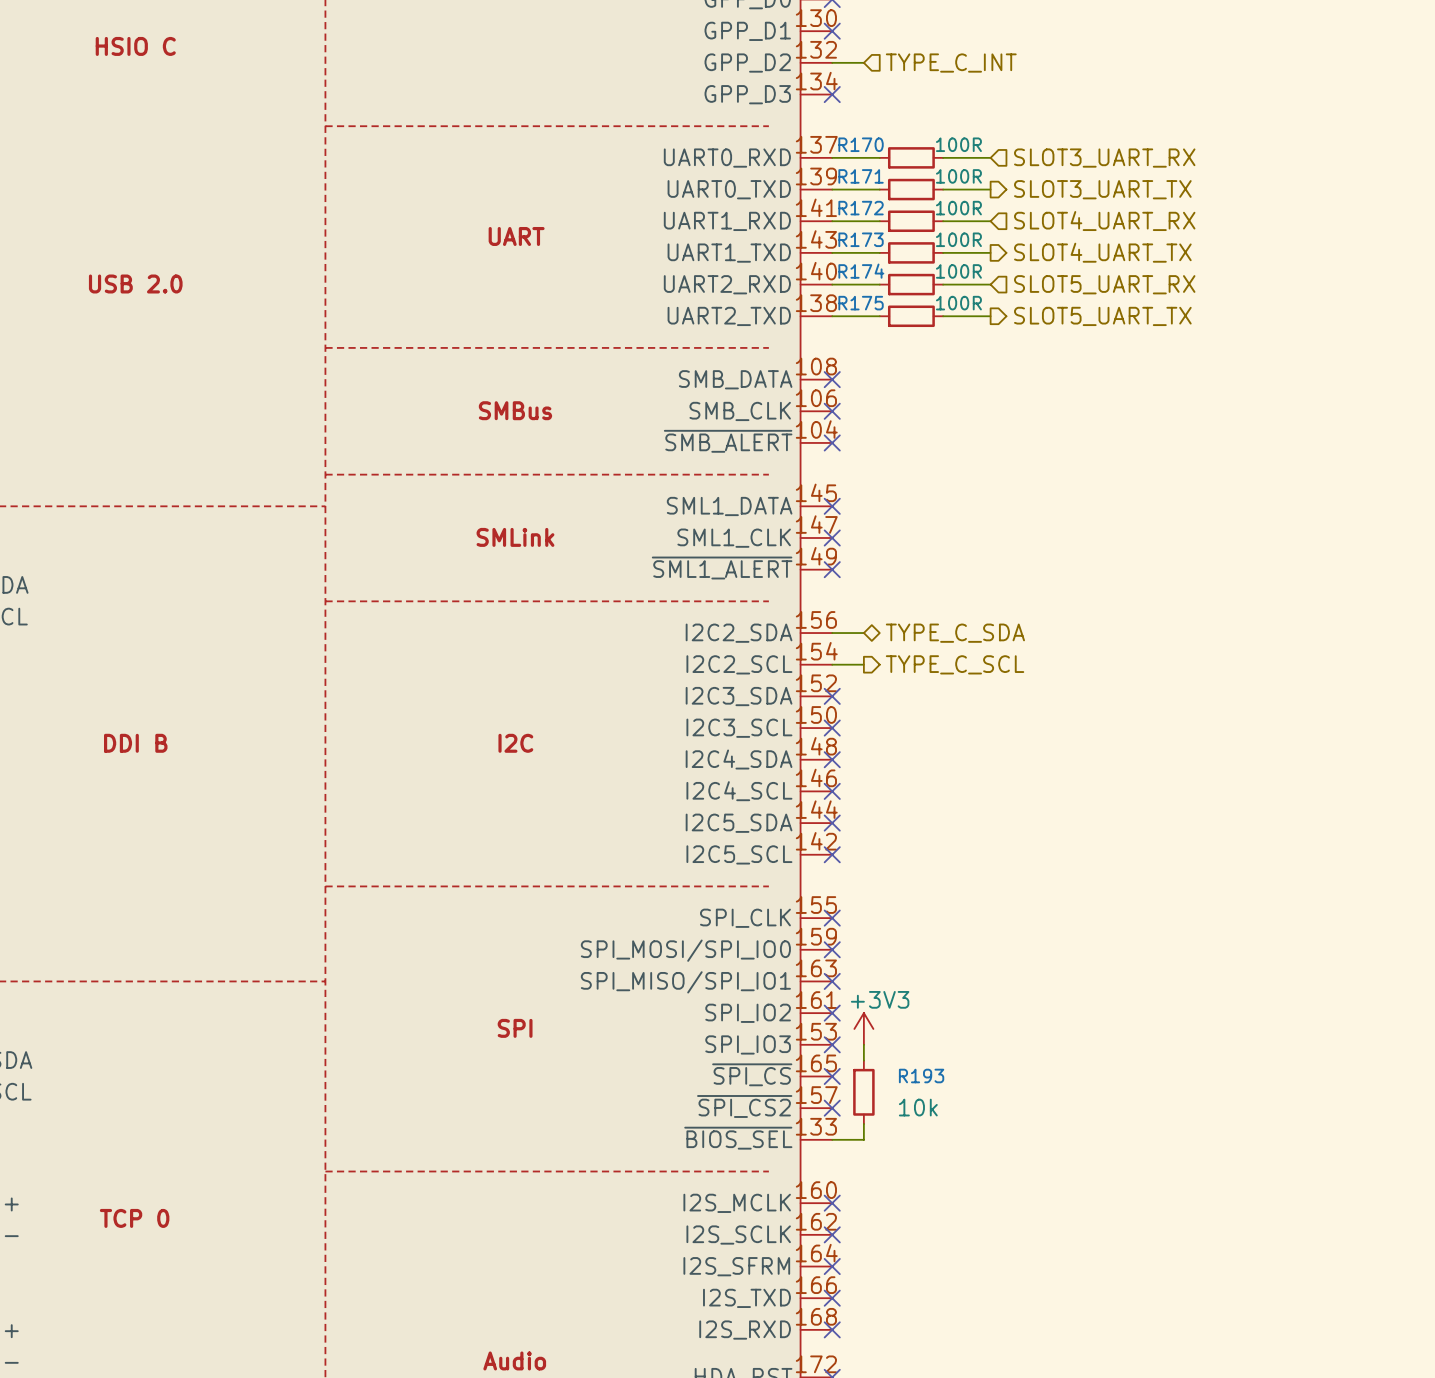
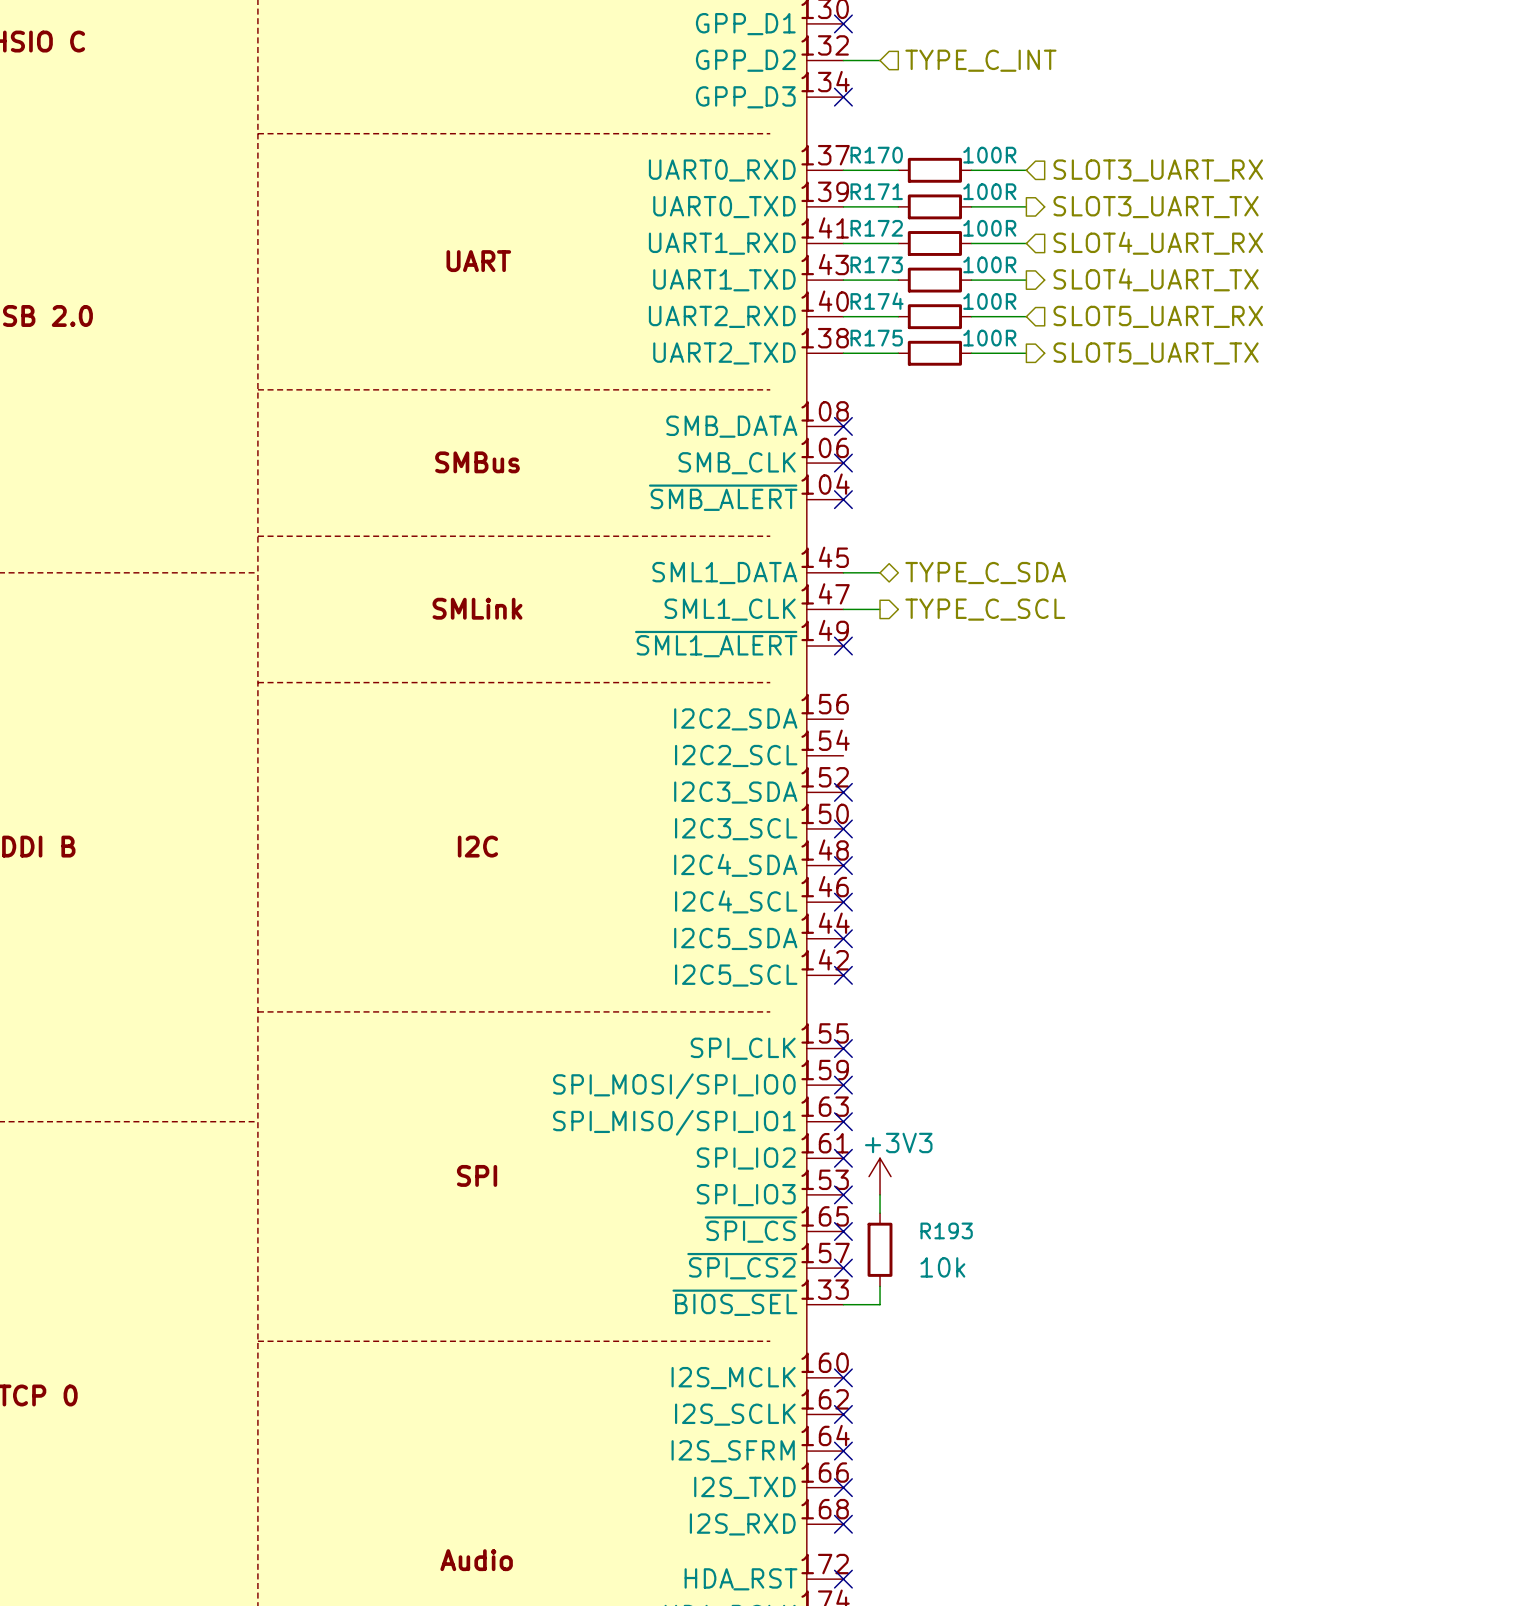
no-connect mark: (832, 506) -> none
no-connect mark: (832, 537) -> none
wire: (832, 633) (863, 633) -> (843, 609) (880, 609)
hierarchical label position: TYPE_C_SDA (955, 633) -> TYPE_C_SDA (985, 573)
wire: (832, 664) (863, 664) -> (843, 572) (880, 572)
hierarchical label position: TYPE_C_SCL (955, 664) -> TYPE_C_SCL (985, 609)

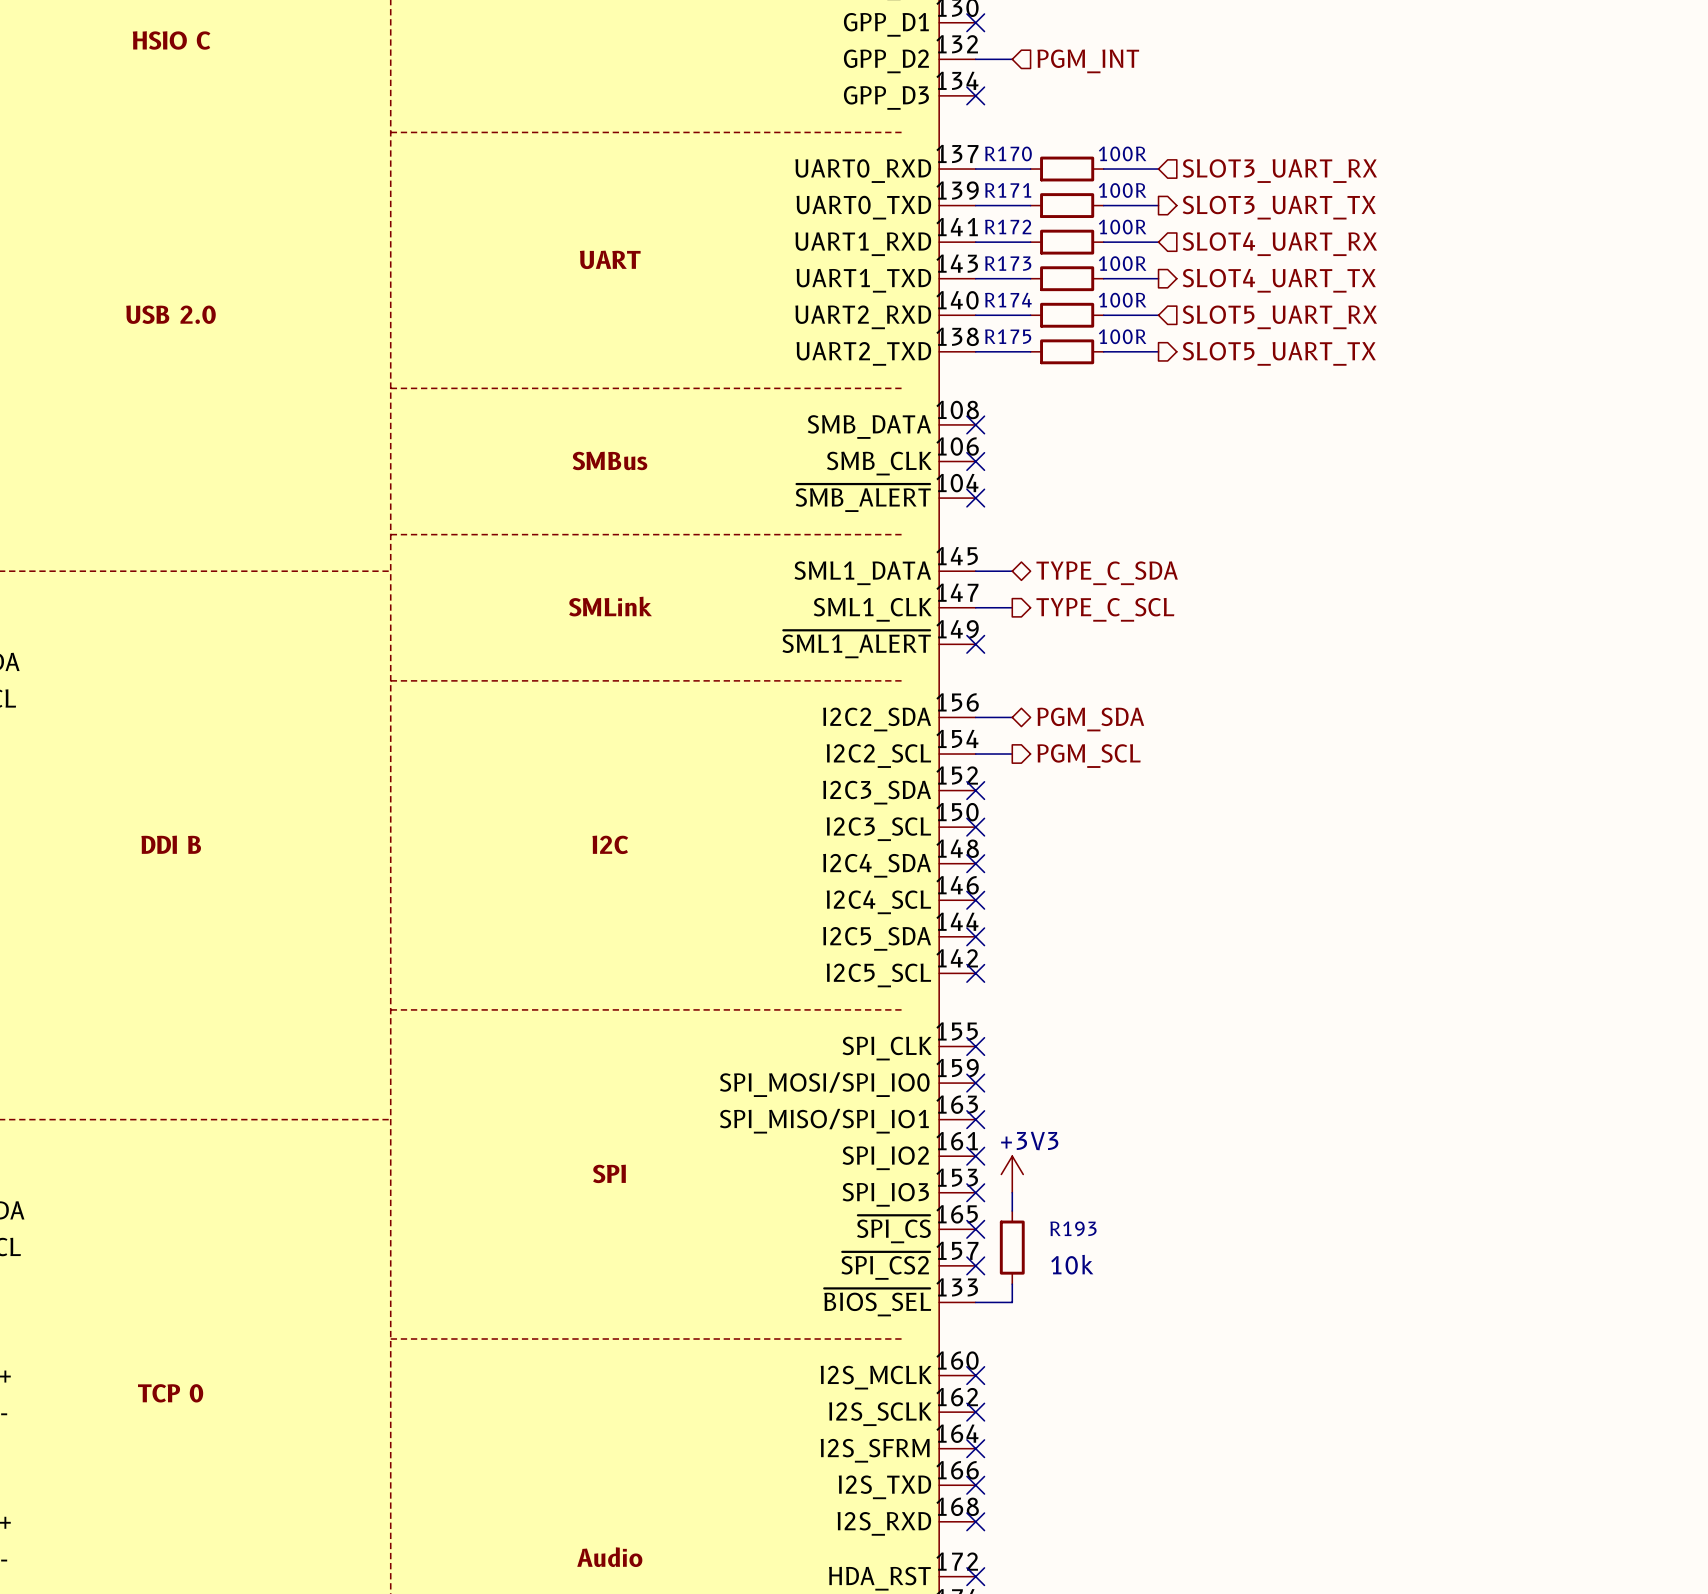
hierarchical label: TYPE_C_INT (980, 60) -> PGM_INT (1088, 61)
wire: none -> (975, 717) (1012, 717)
hierarchical label: none -> PGM_SDA (1090, 719)
wire: none -> (975, 754) (1012, 754)
hierarchical label: none -> PGM_SCL (1088, 756)

